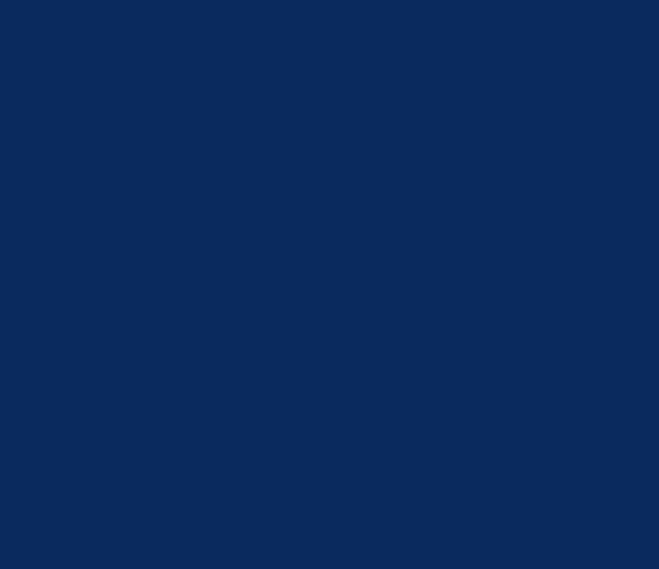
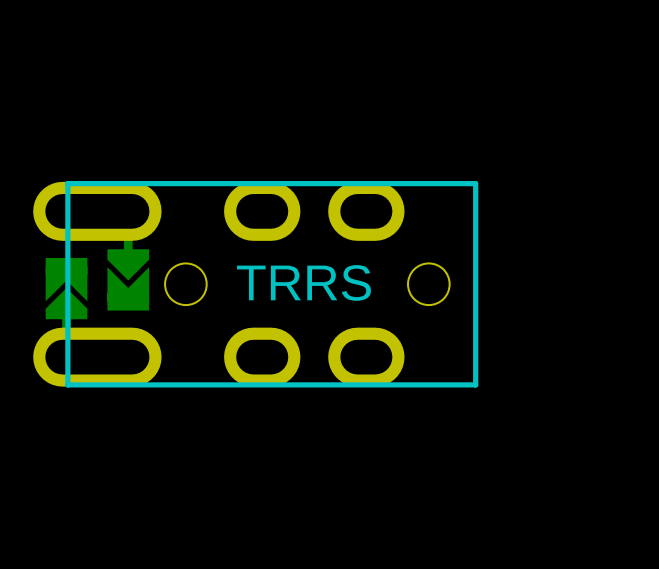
part: none -> (255, 284)

